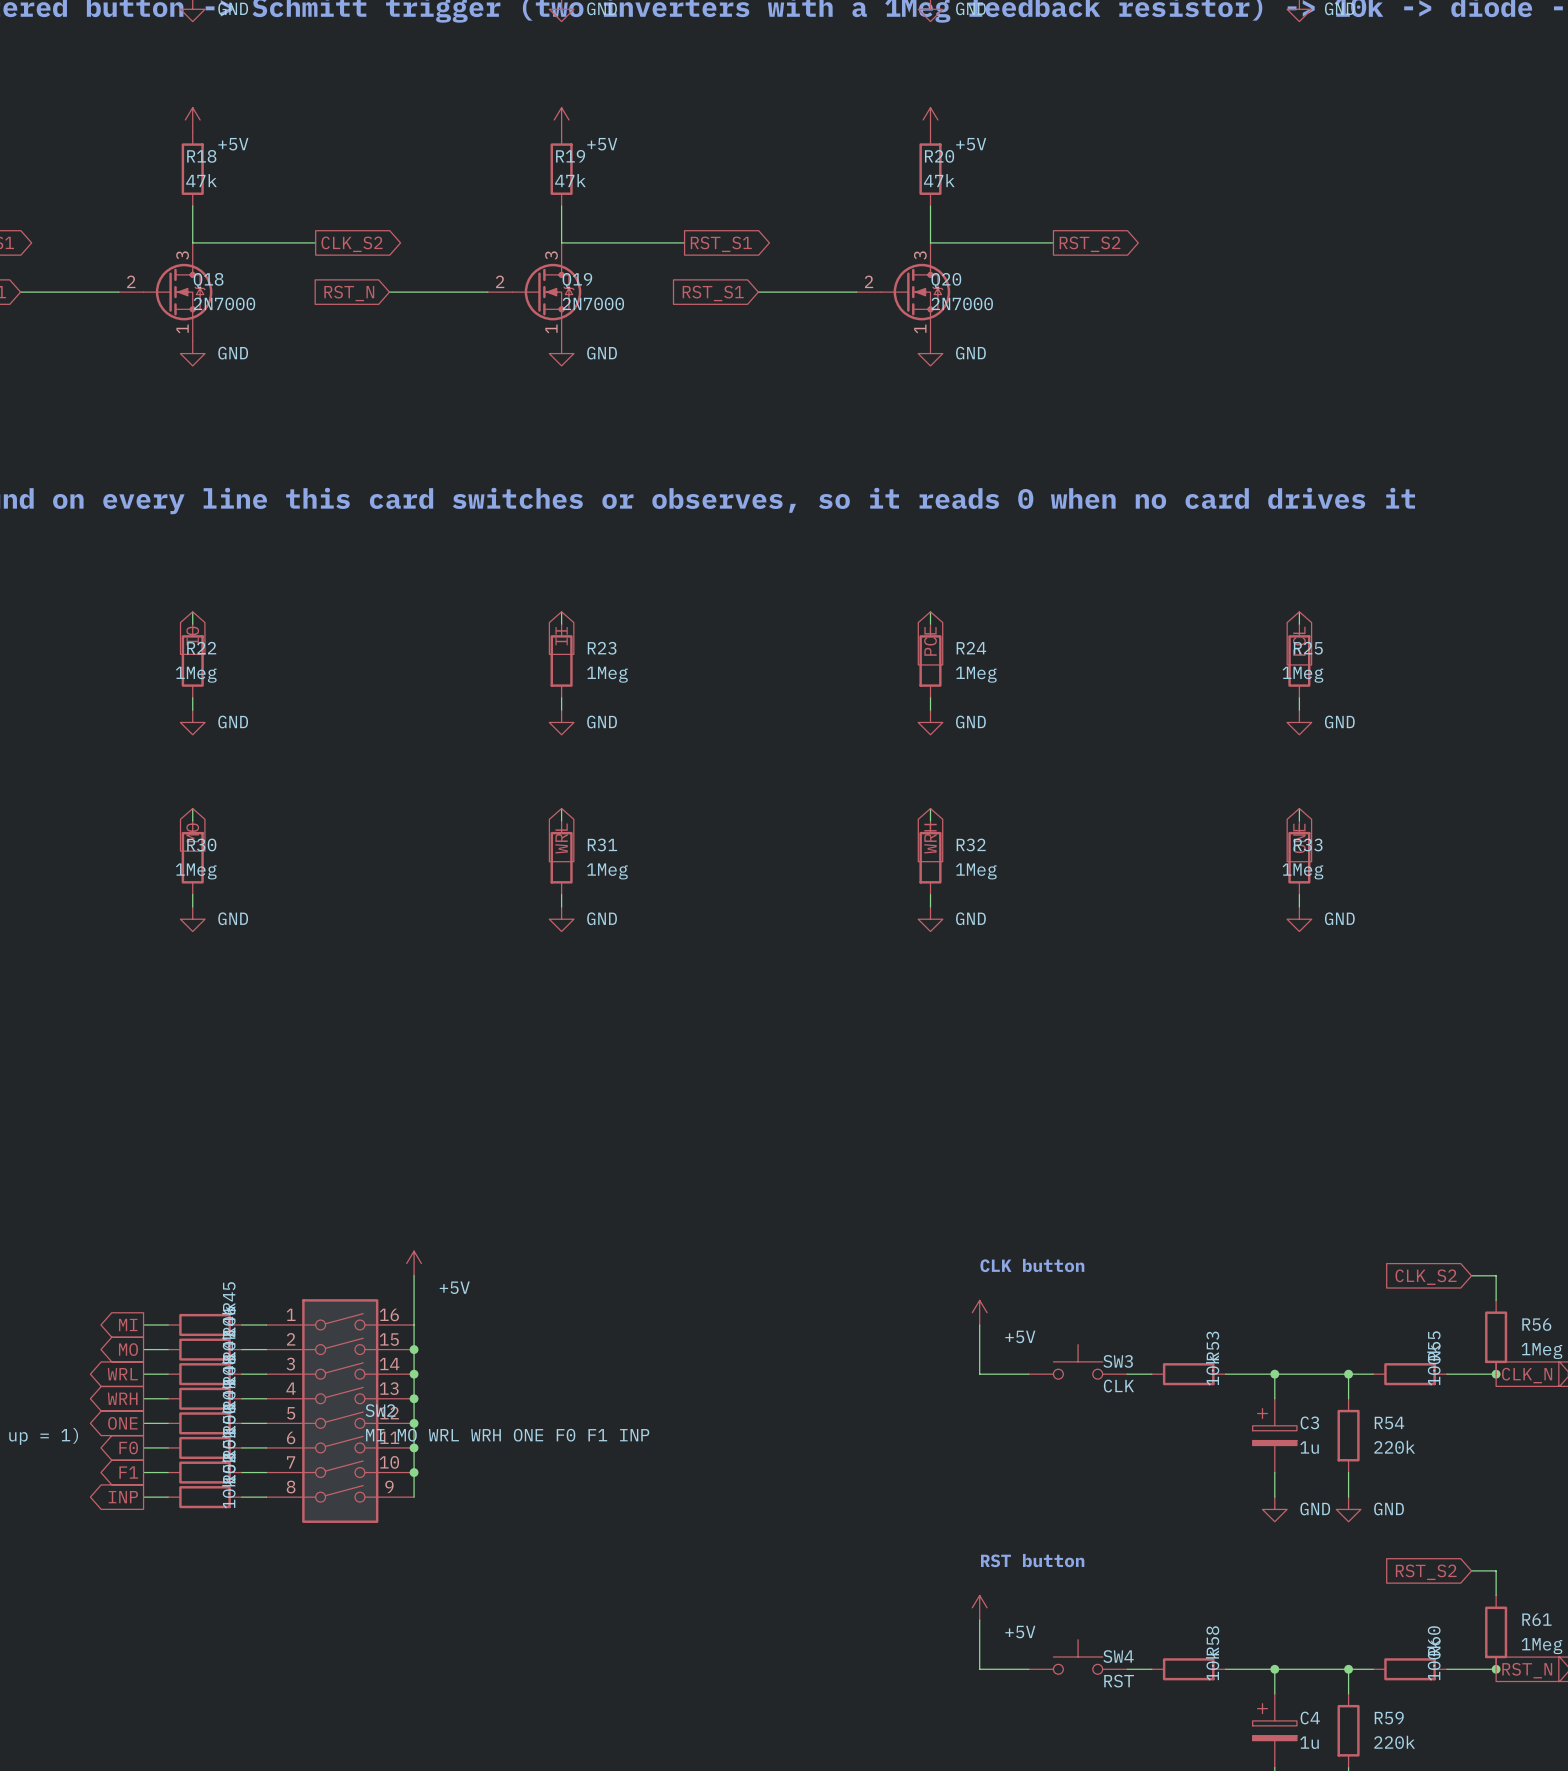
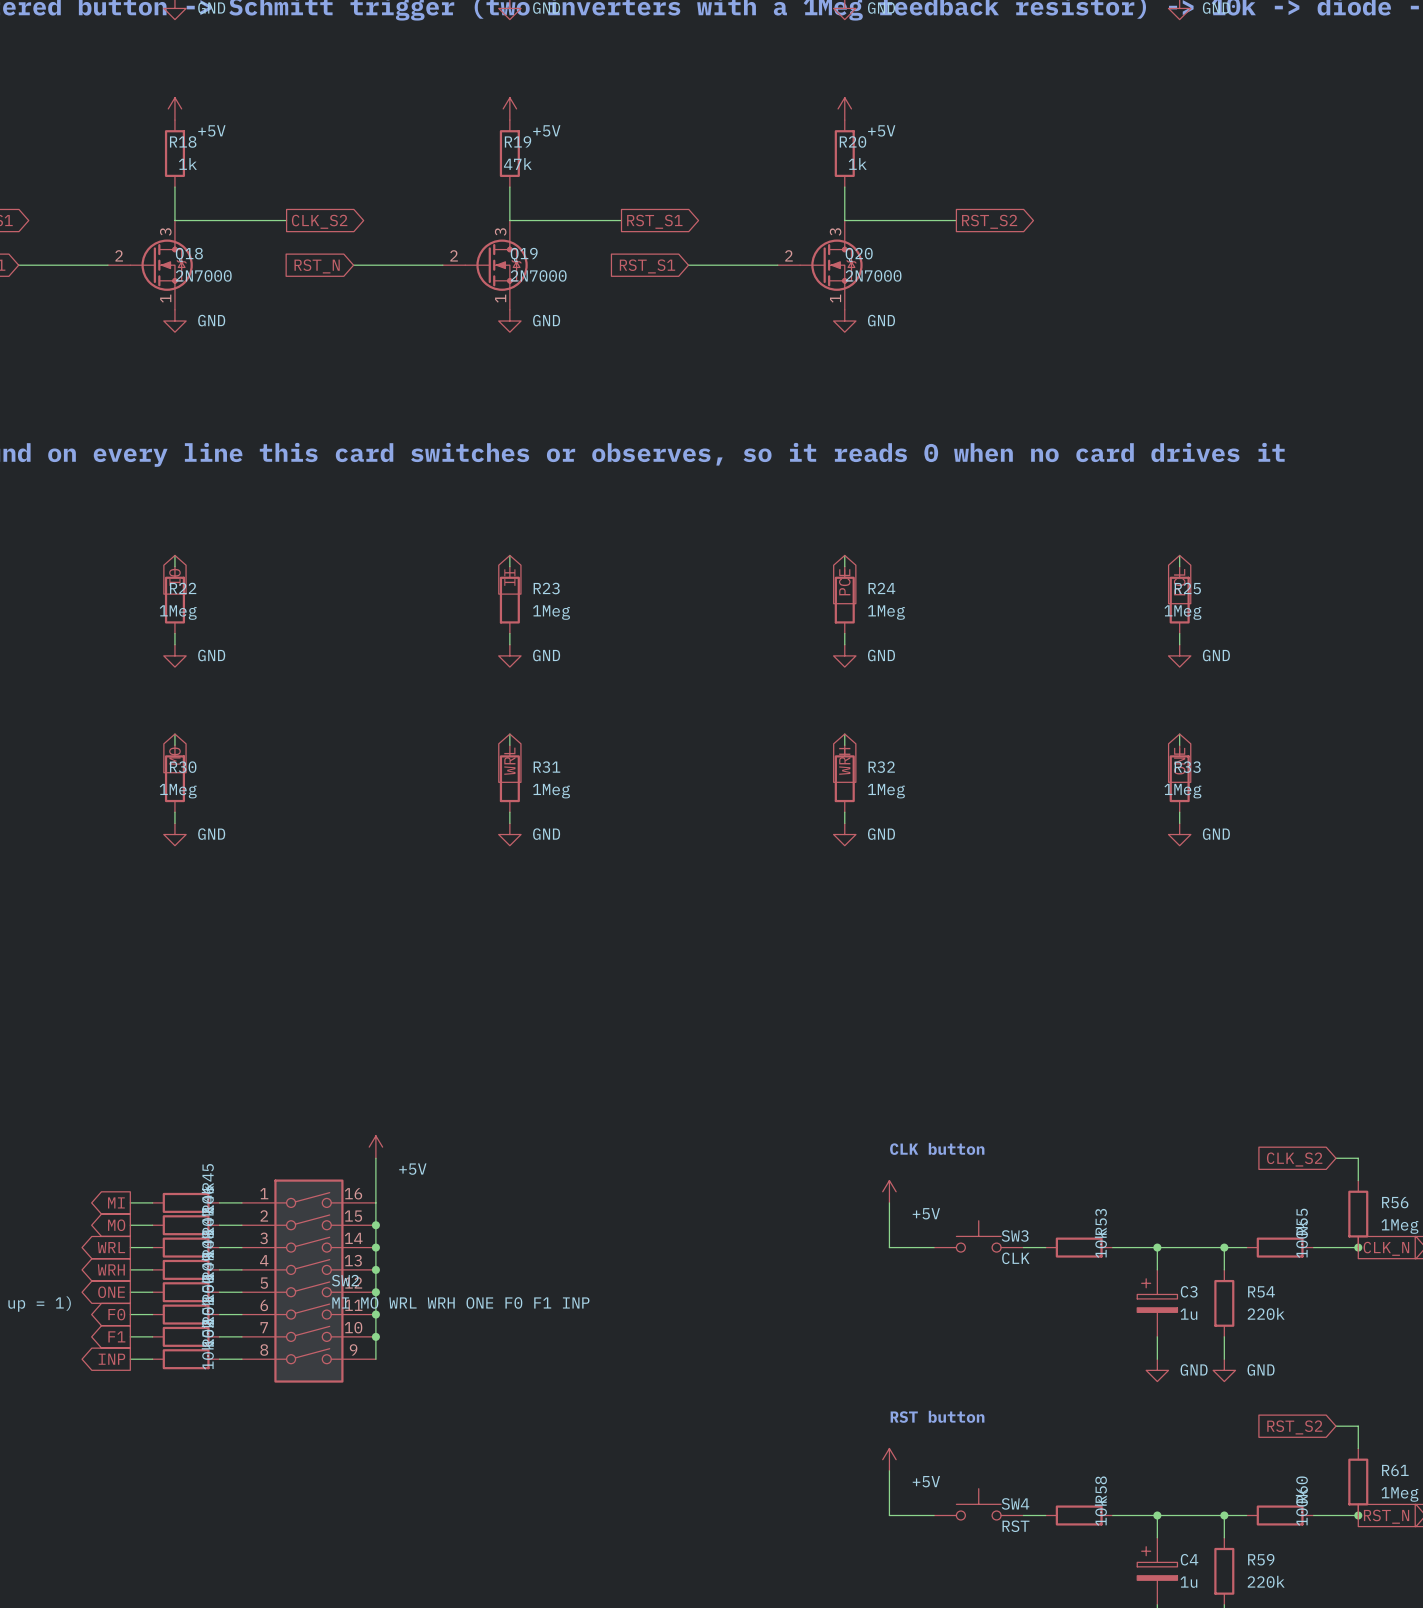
R18 value: 47k (201, 180) -> 1k (187, 163)
R20 value: 47k (939, 180) -> 1k (857, 163)

